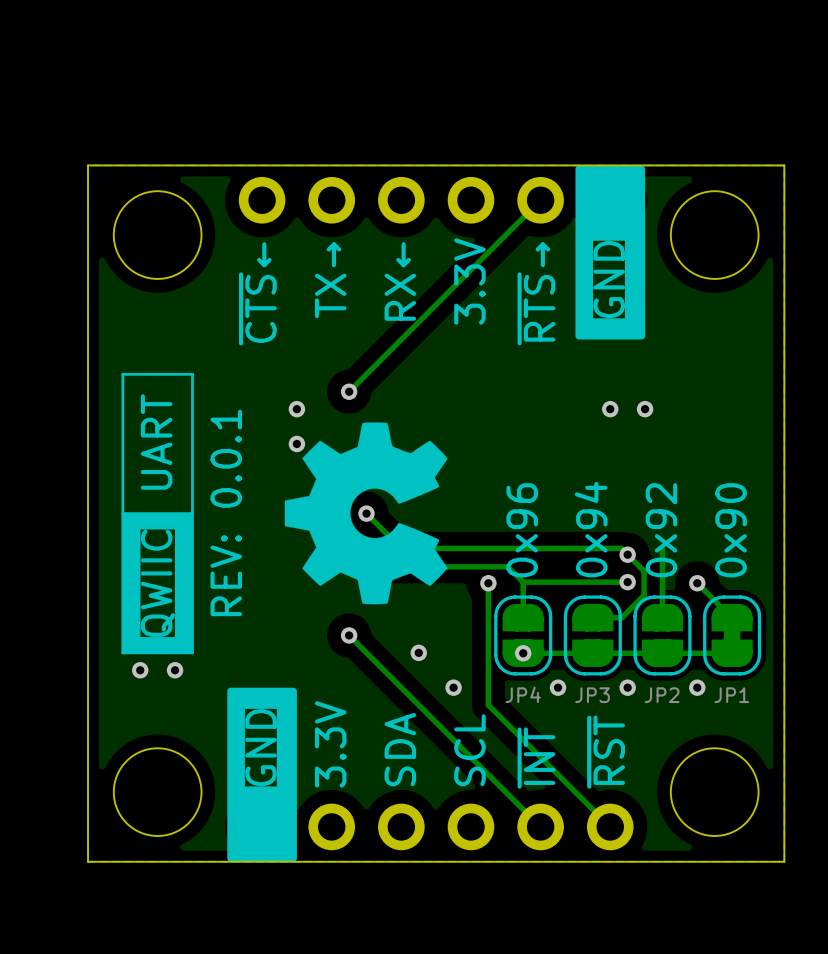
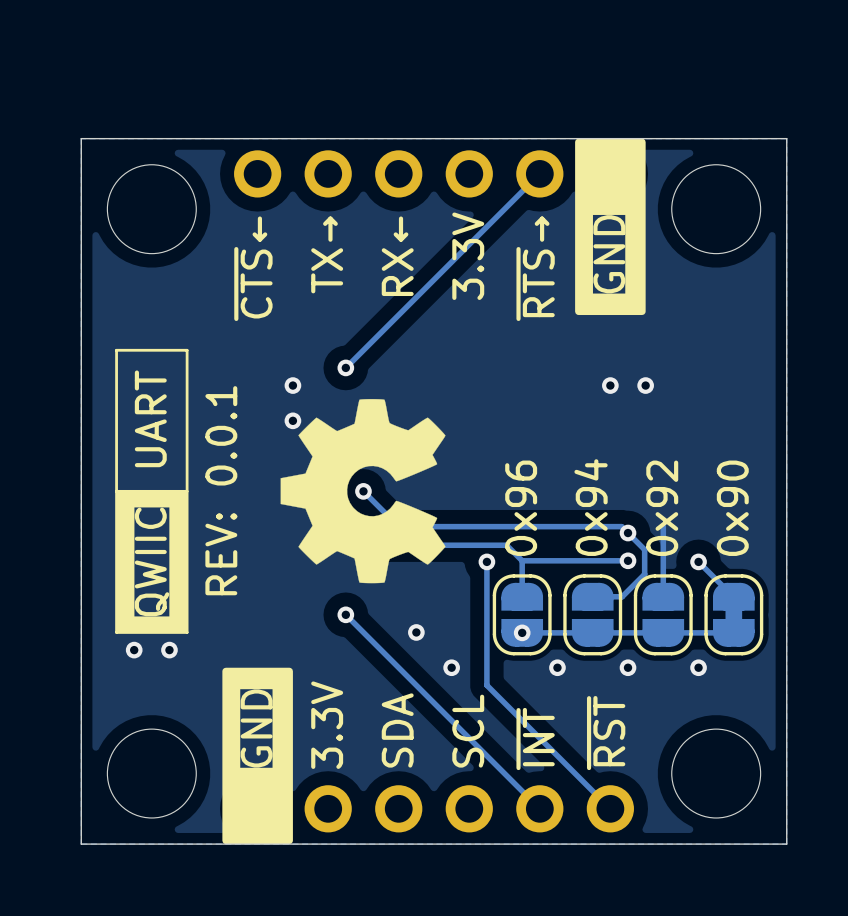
JP4 name: JP4 (523, 694) -> none
JP3 name: JP3 (592, 695) -> none
JP2 name: JP2 (662, 695) -> none
JP1 name: JP1 (731, 695) -> none

